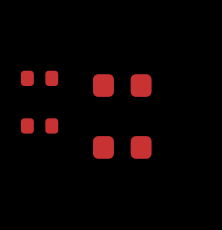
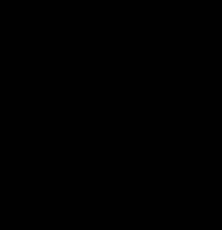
part: (39, 78) -> none
part: (122, 85) -> none
part: (39, 125) -> none
part: (122, 147) -> none

